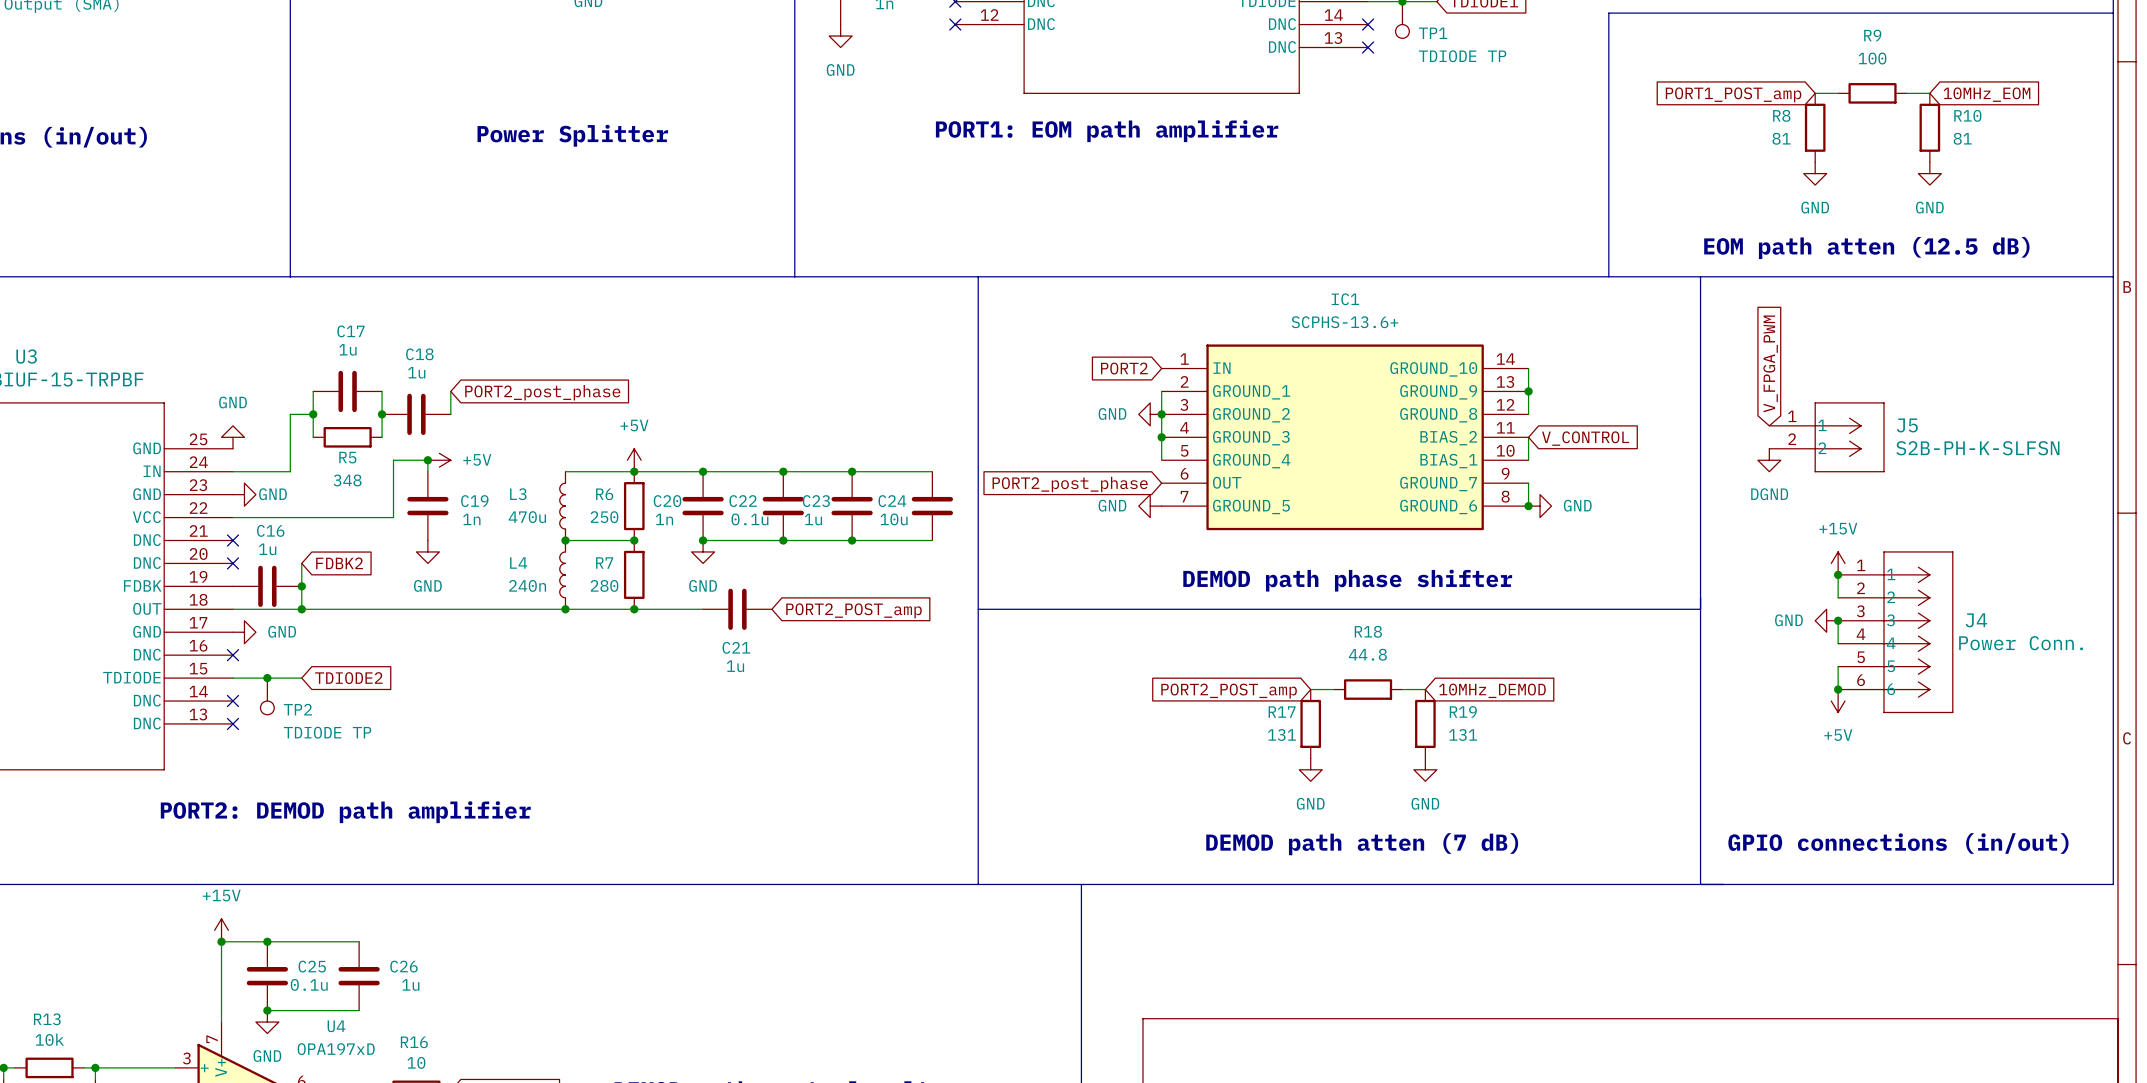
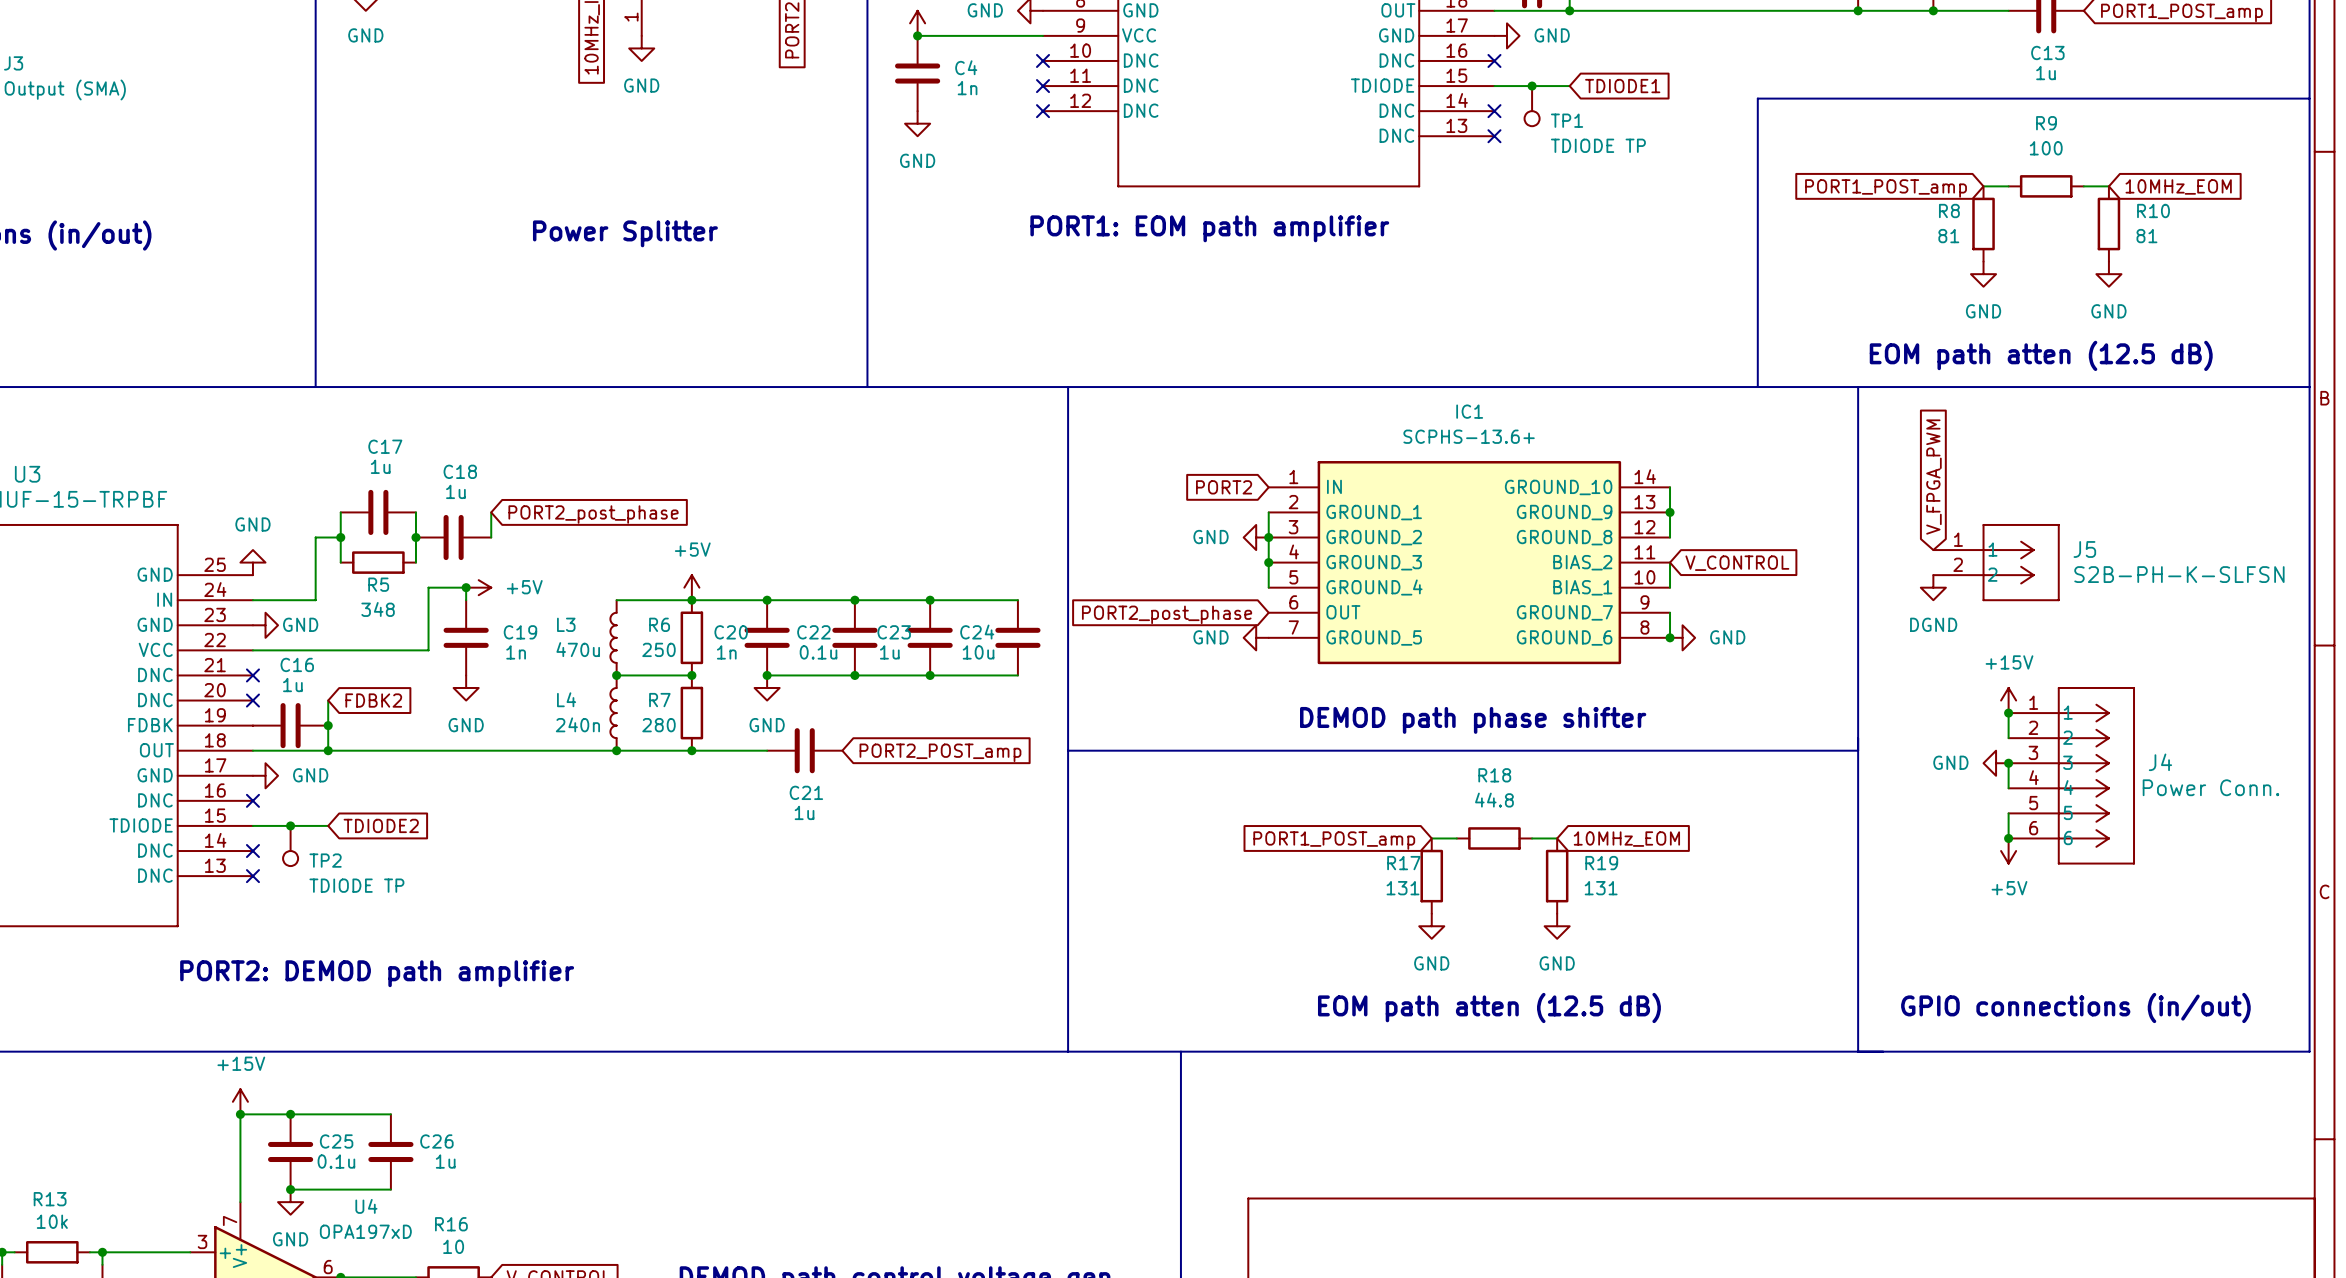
global label: 10MHz_DEMOD (1492, 690) -> 10MHz_EOM (1626, 839)
global label: PORT2_POST_amp (1229, 691) -> PORT1_POST_amp (1334, 840)
text: DEMOD path atten (7 dB) (1362, 844) -> EOM path atten (12.5 dB) (1489, 1007)

